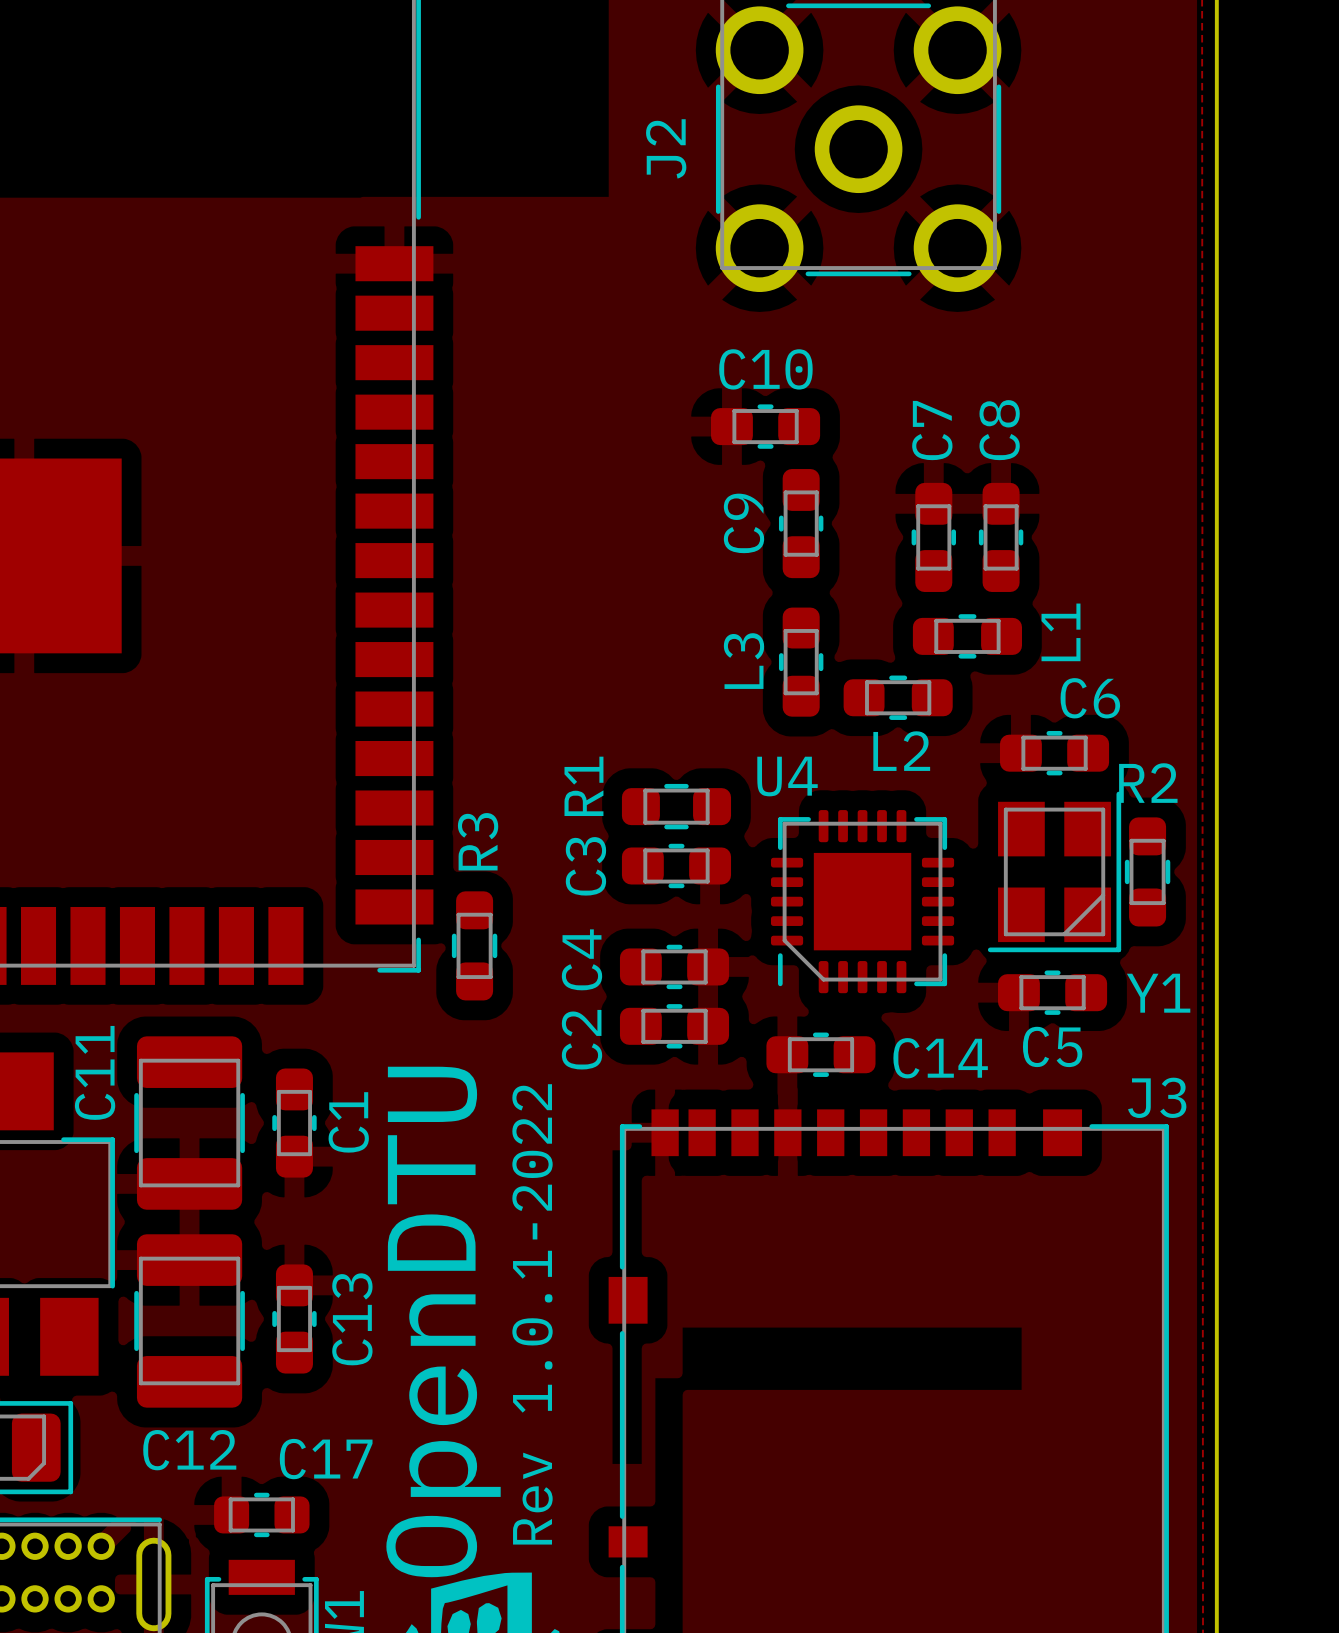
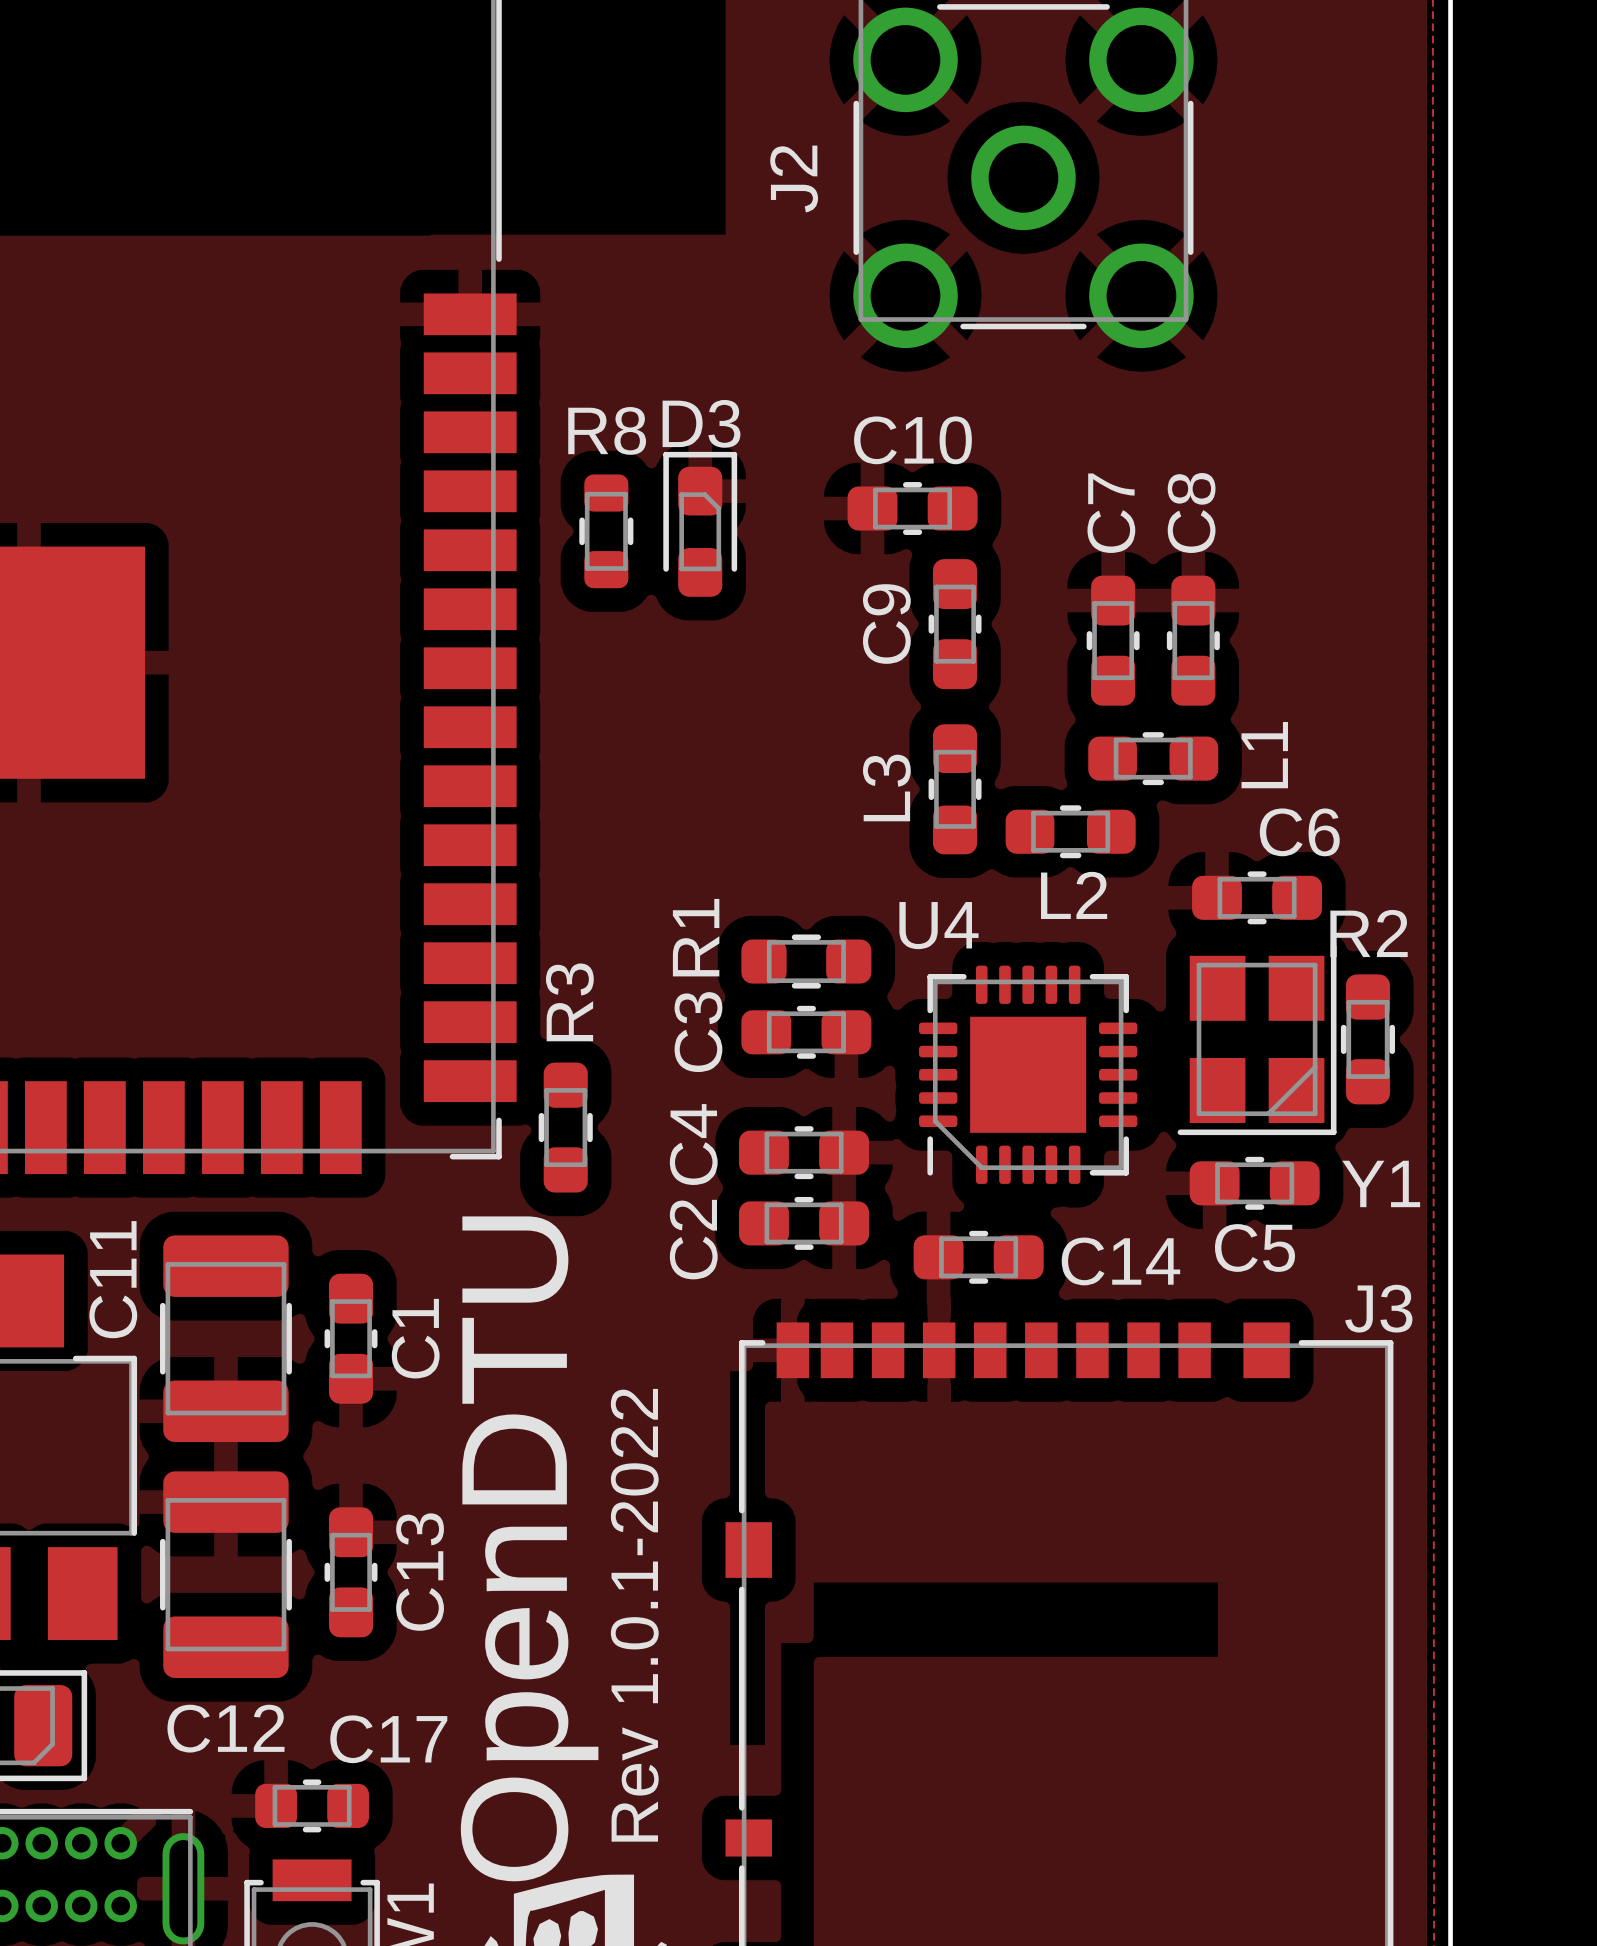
D3: none -> (700, 524)
R8: none -> (606, 531)

